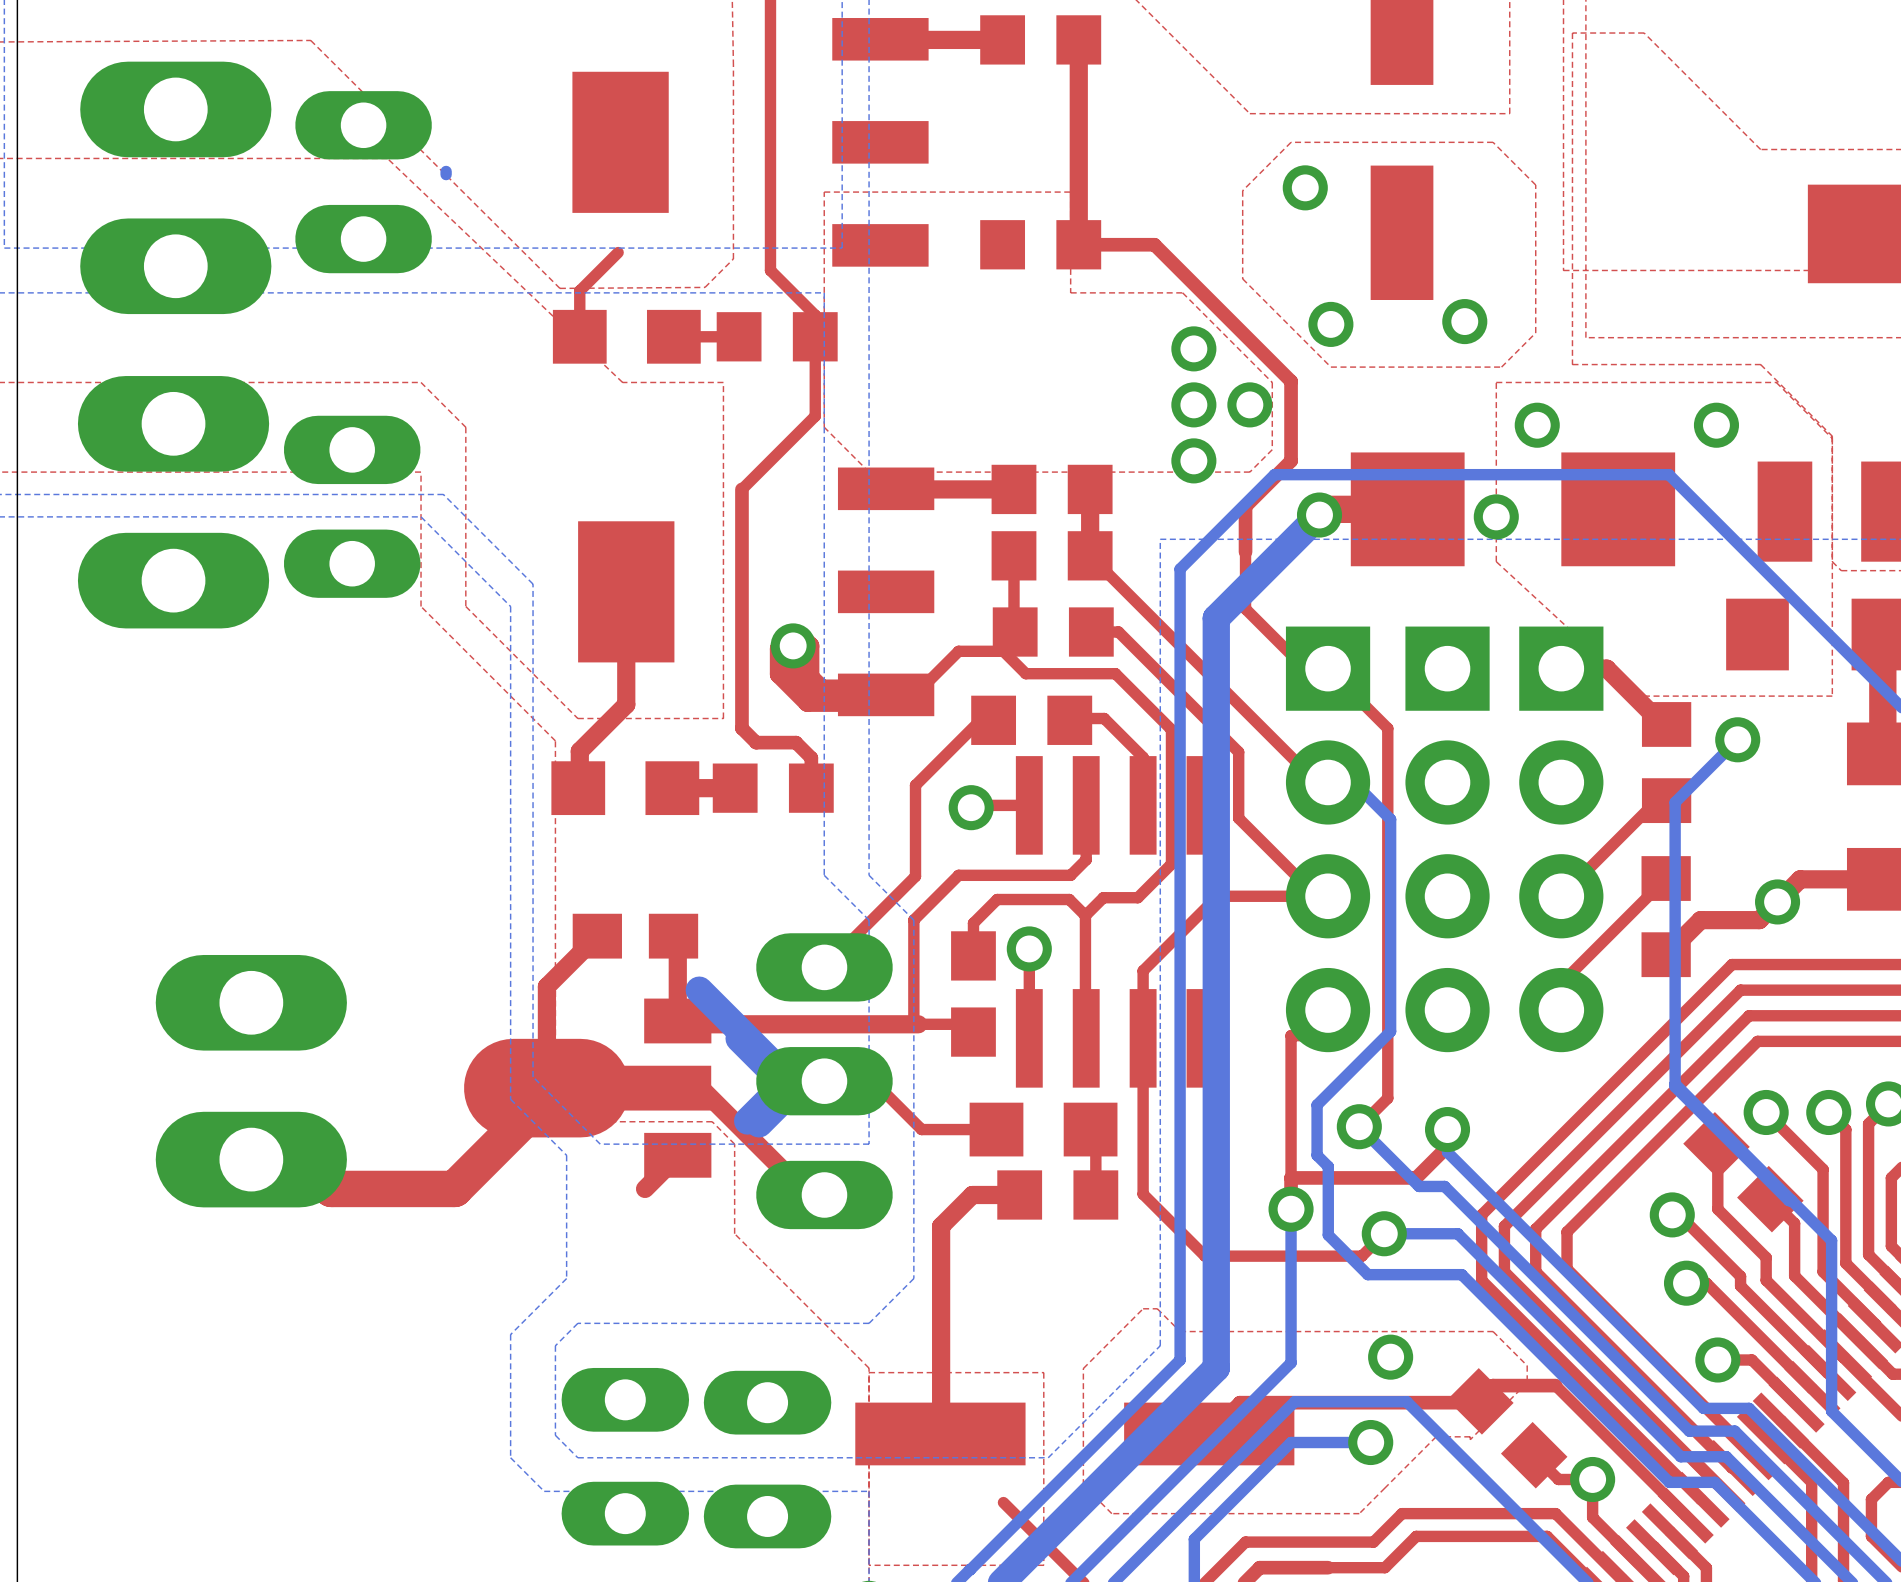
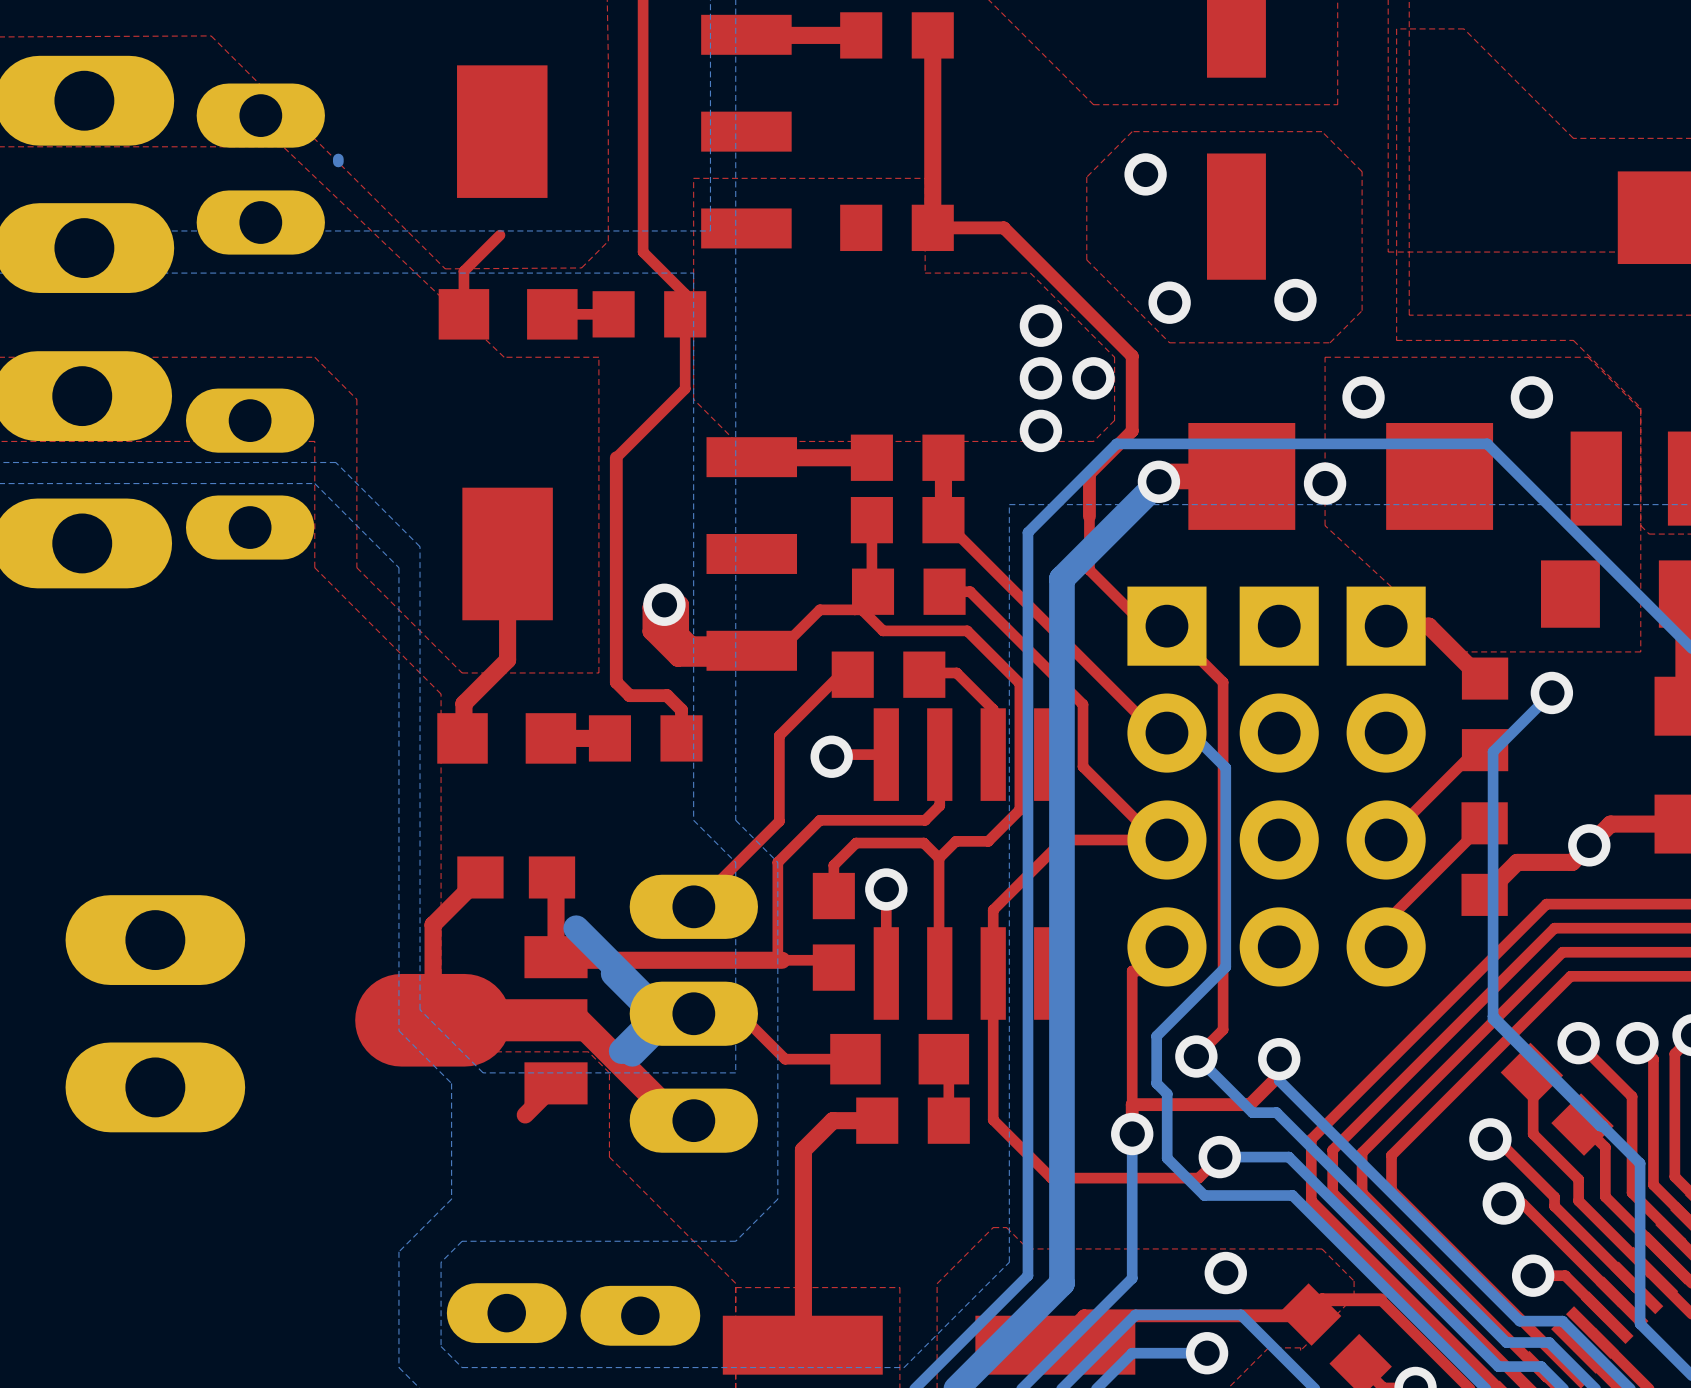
top track: (555, 1088) (454, 1188) (331, 1188) (302, 1159) (251, 1159) -> none
top track width: thin (701, 1088) (807, 1194) (824, 1194) -> thick (577, 1020) (678, 1120) (693, 1120)

